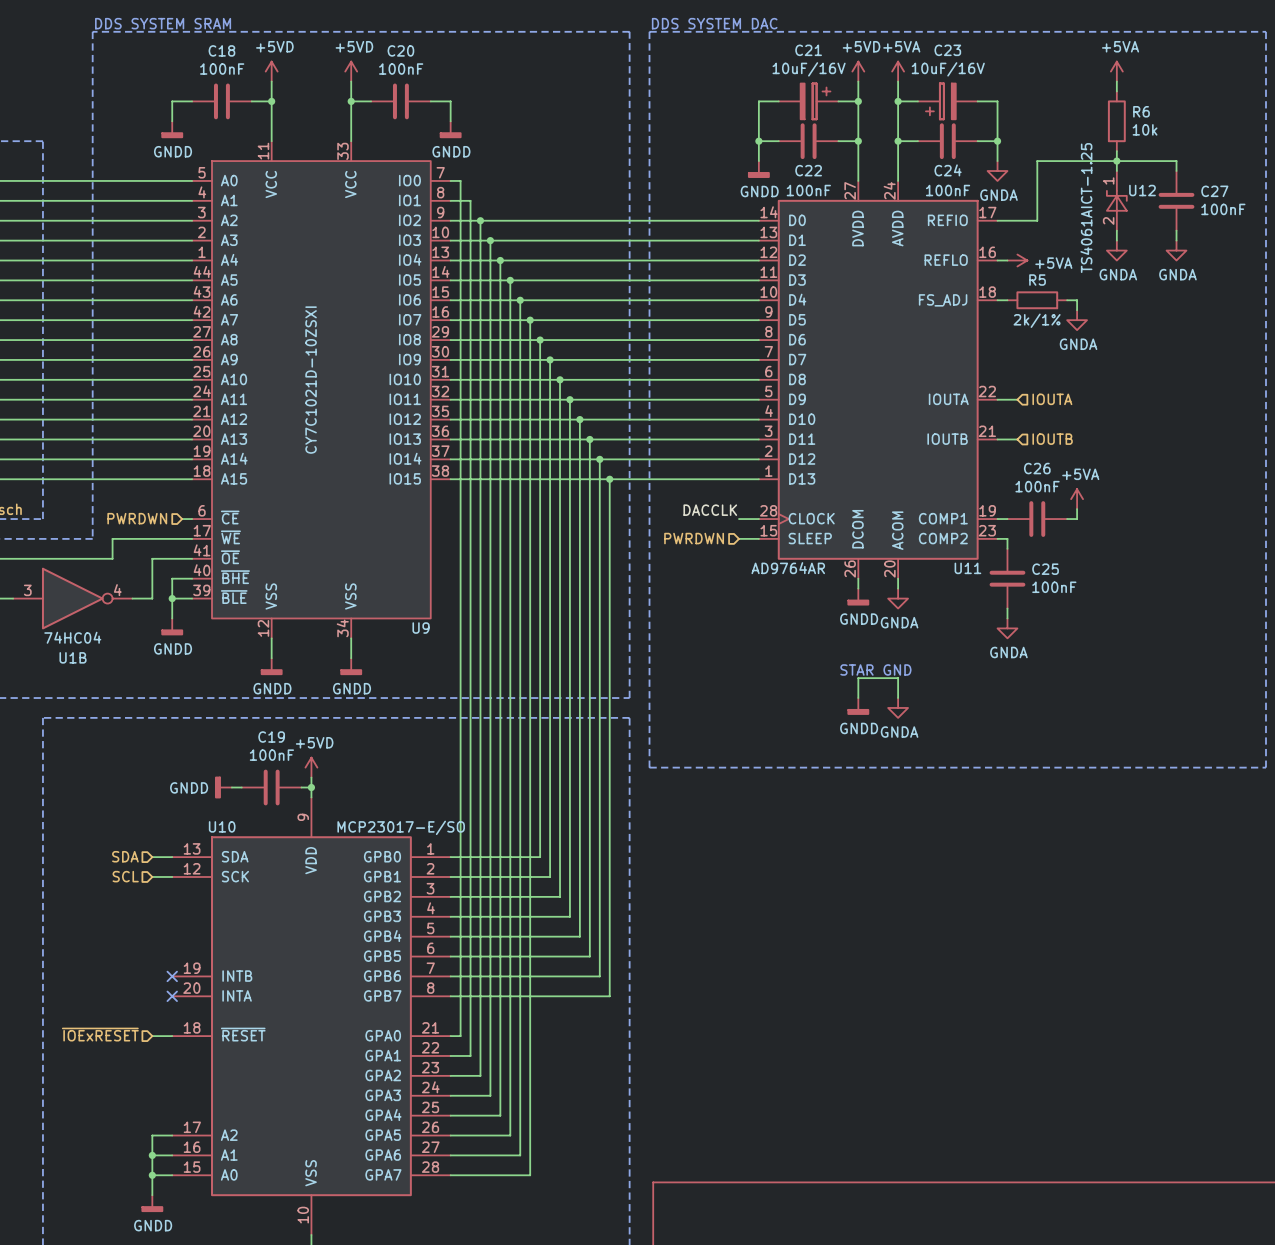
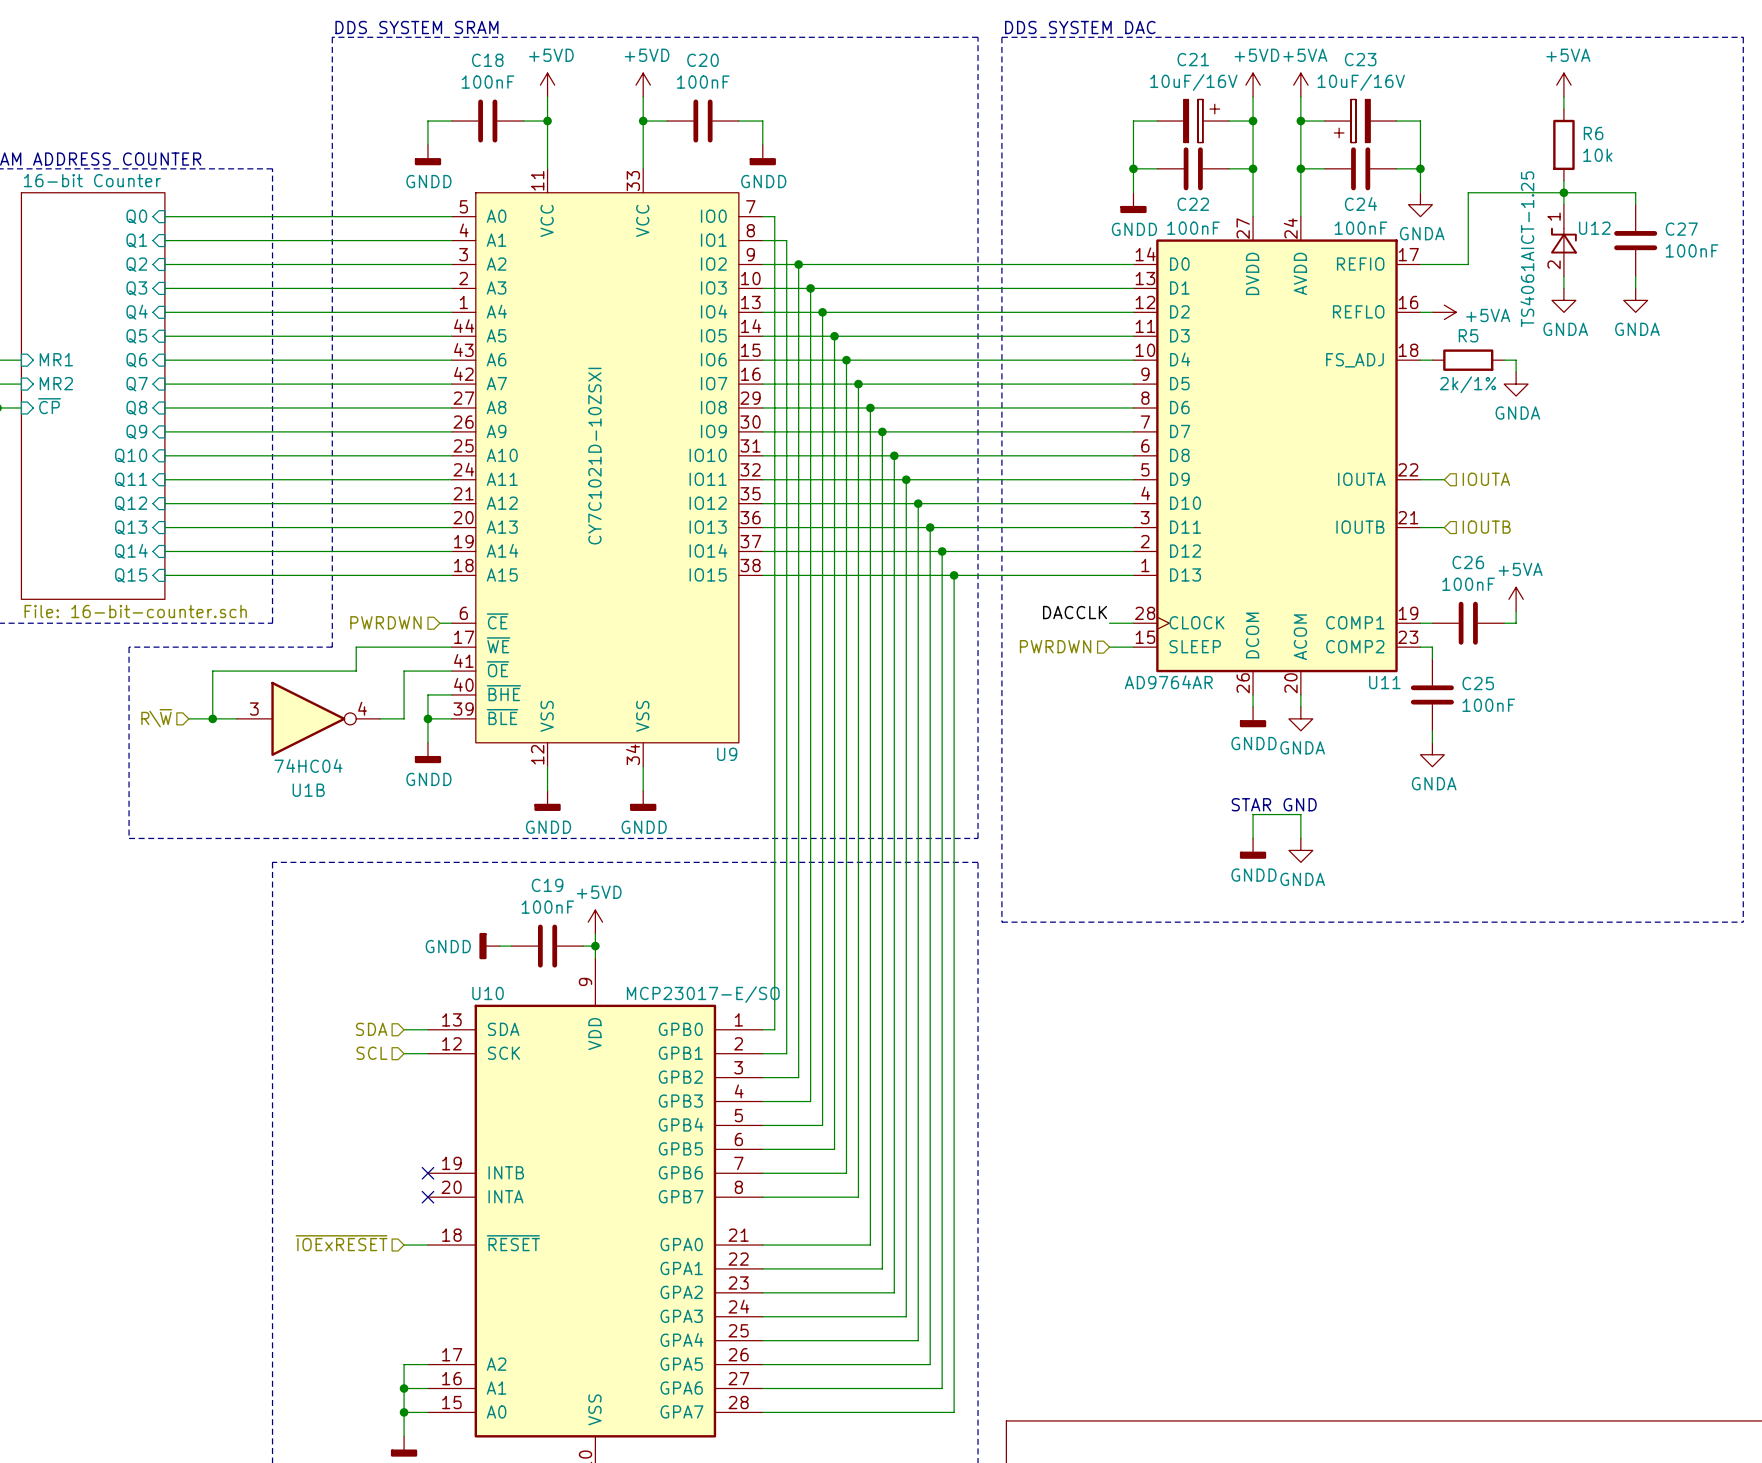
wire: (540, 857) (460, 857) (460, 1036) -> (870, 1029) (870, 1245) (774, 1245)
wire: (550, 876) (470, 876) (470, 1055) -> (882, 1053) (882, 1268) (786, 1268)
wire: (560, 896) (480, 896) (480, 1075) -> (894, 1077) (894, 1292) (798, 1292)
wire: (569, 916) (490, 916) (490, 1095) -> (906, 1101) (906, 1316) (810, 1316)
wire: (579, 936) (500, 936) (500, 1115) -> (918, 1125) (918, 1340) (822, 1340)
wire: (589, 956) (510, 956) (510, 1135) -> (930, 1149) (930, 1364) (834, 1364)
wire: (599, 976) (520, 976) (520, 1155) -> (942, 1173) (942, 1388) (846, 1388)
wire: (609, 996) (530, 996) (530, 1175) -> (954, 1197) (954, 1412) (858, 1412)

